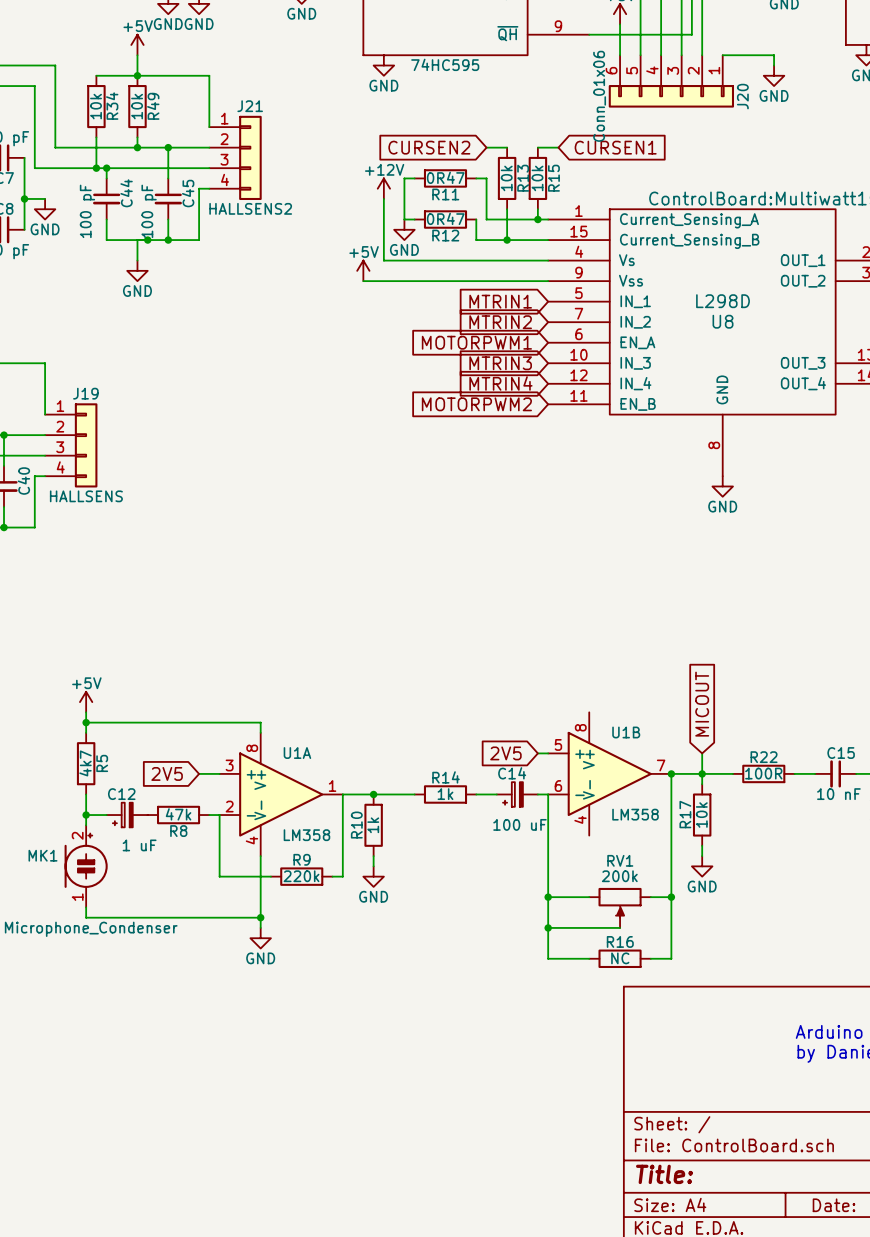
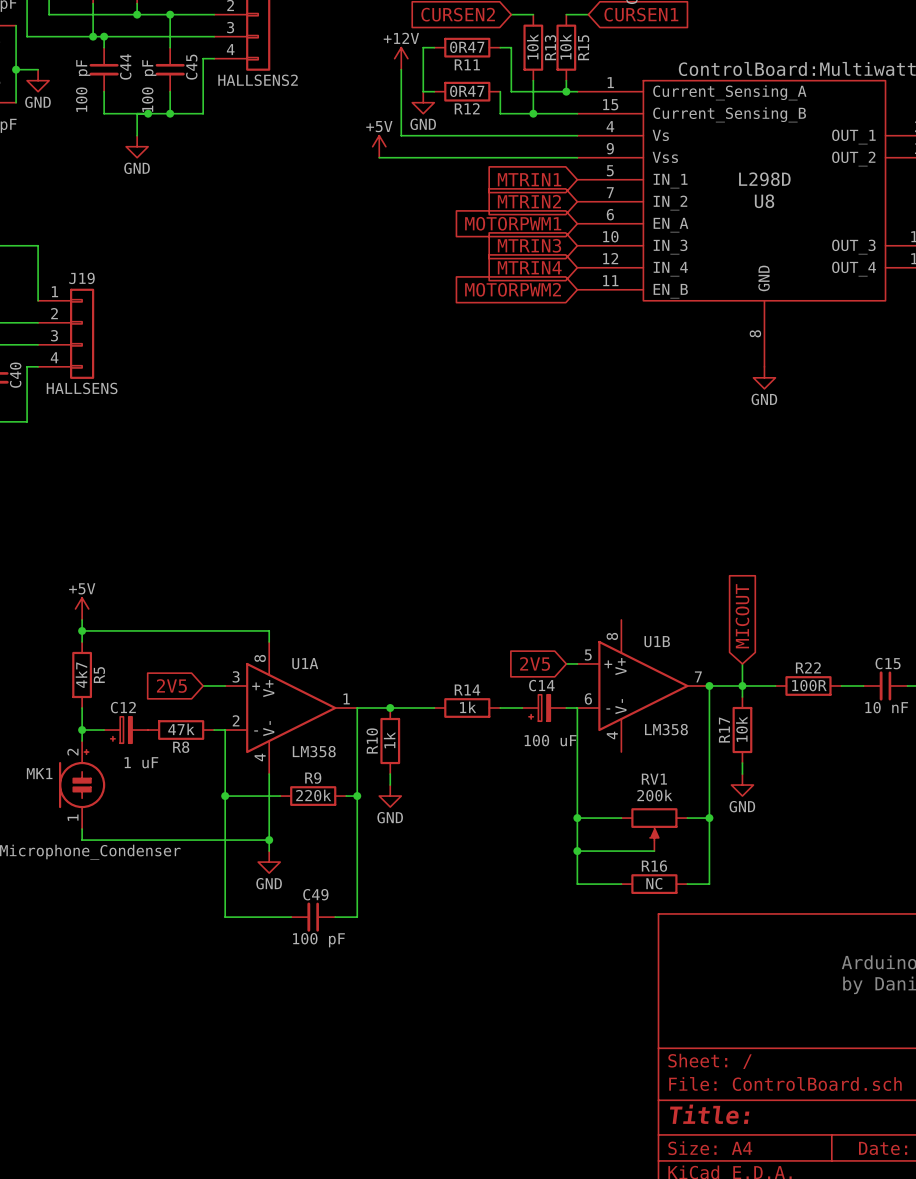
wire: none -> (225, 796) (225, 917) (291, 917)
junction: none -> (225, 796)
wire: none -> (357, 796) (357, 917) (335, 917)
junction: none -> (357, 796)
C49: none -> 100 pF (313, 917)

